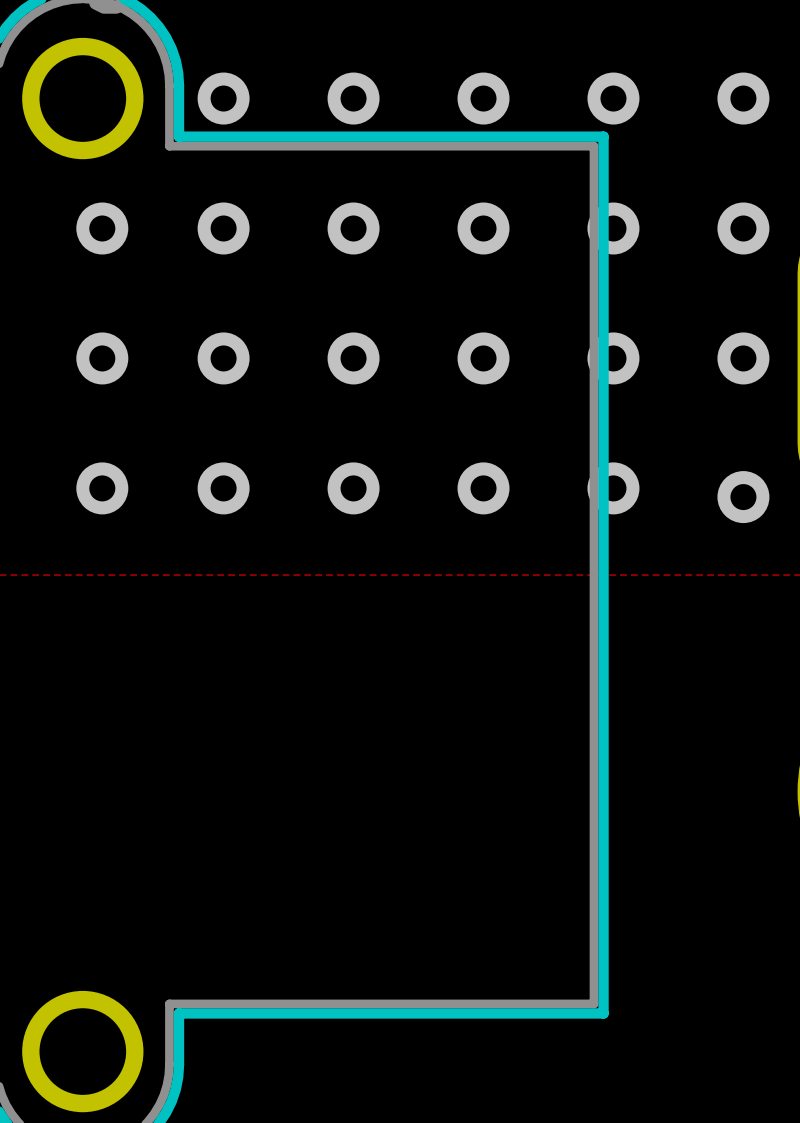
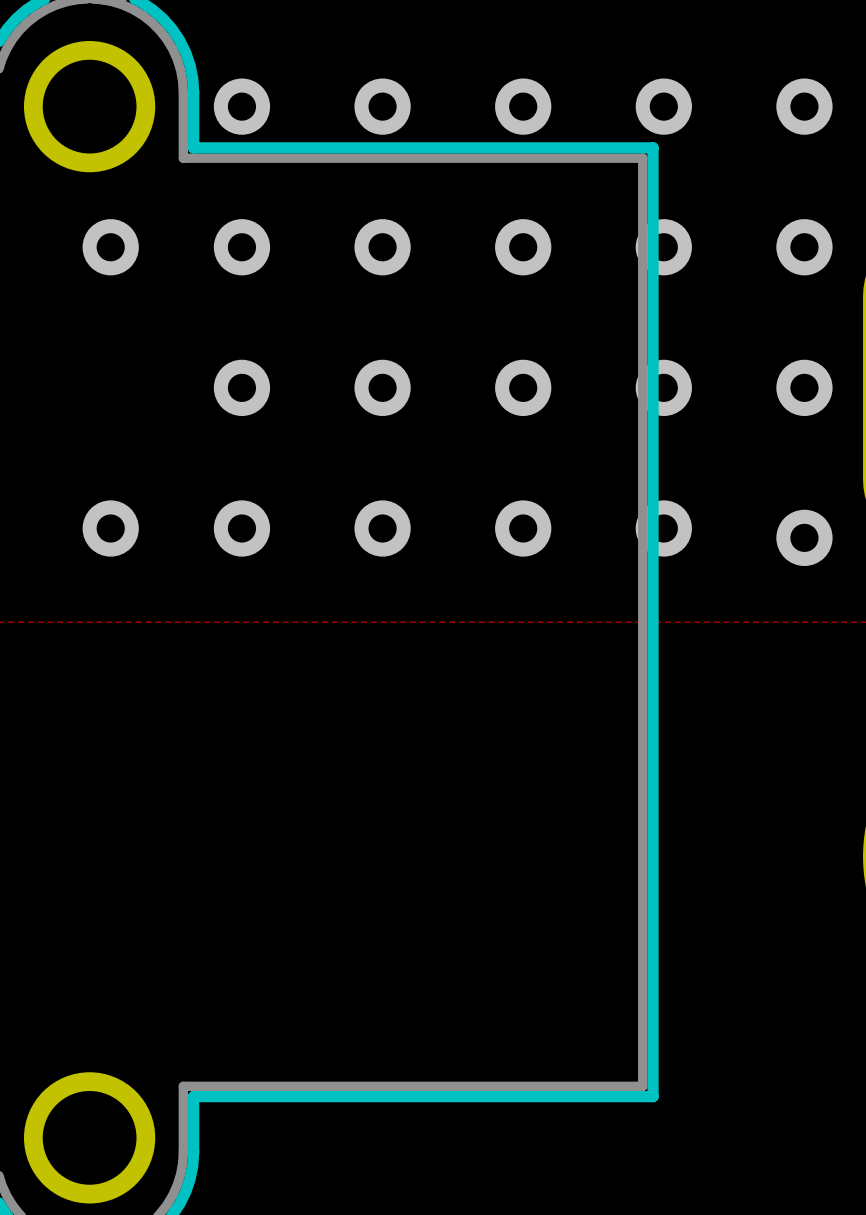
via: (102, 358) -> none

